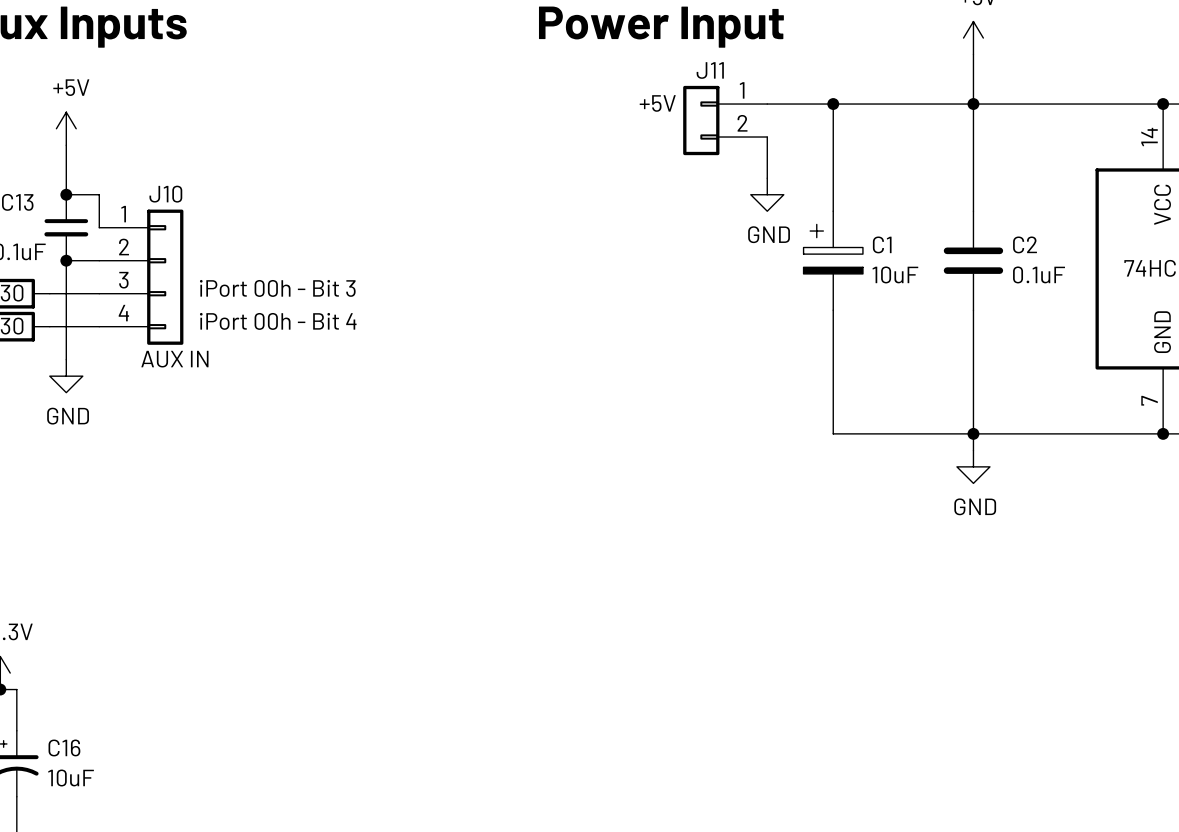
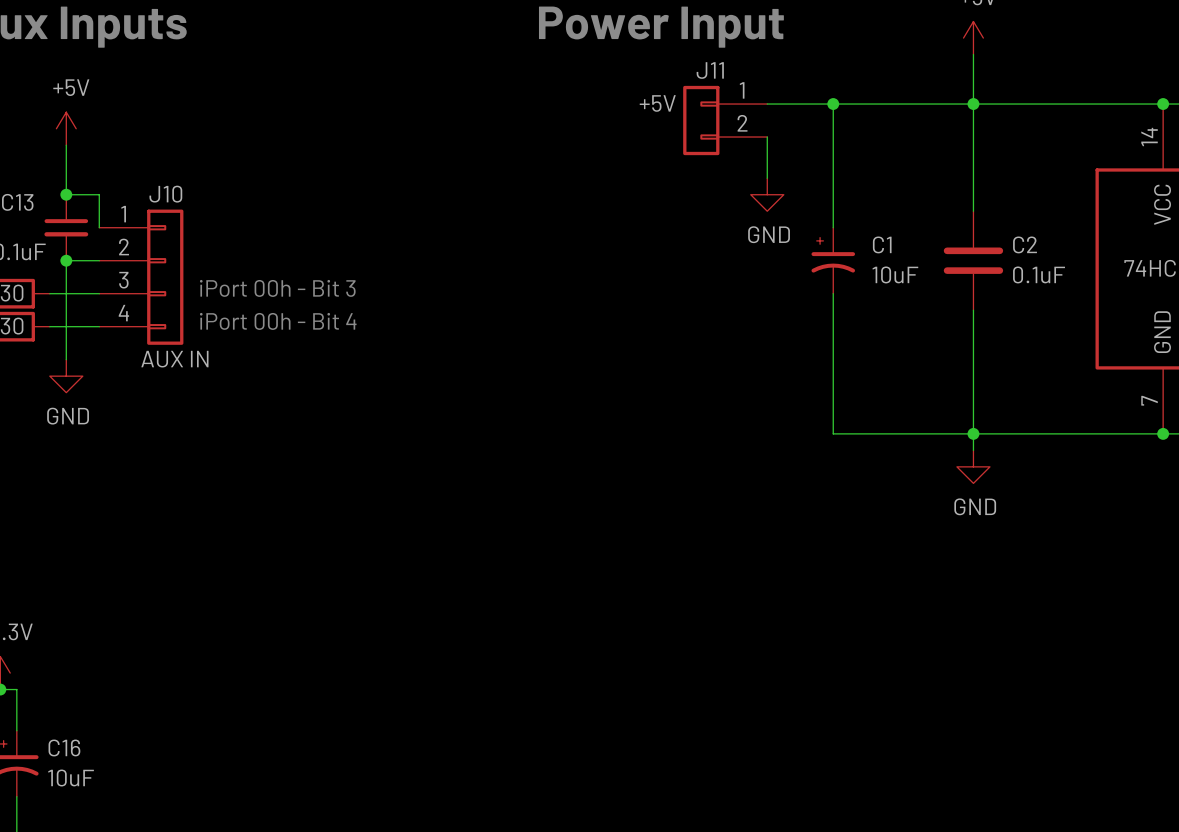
C1 symbol: [803, 211, 863, 311] -> [811, 227, 856, 294]

